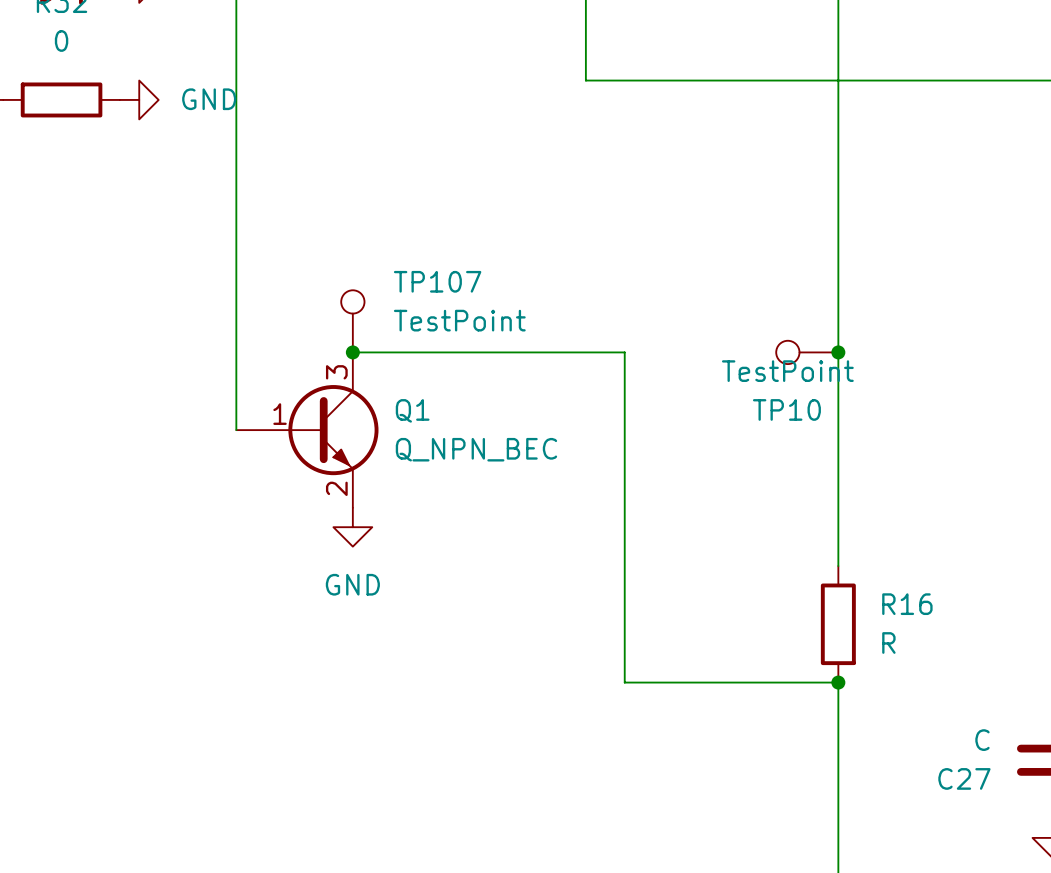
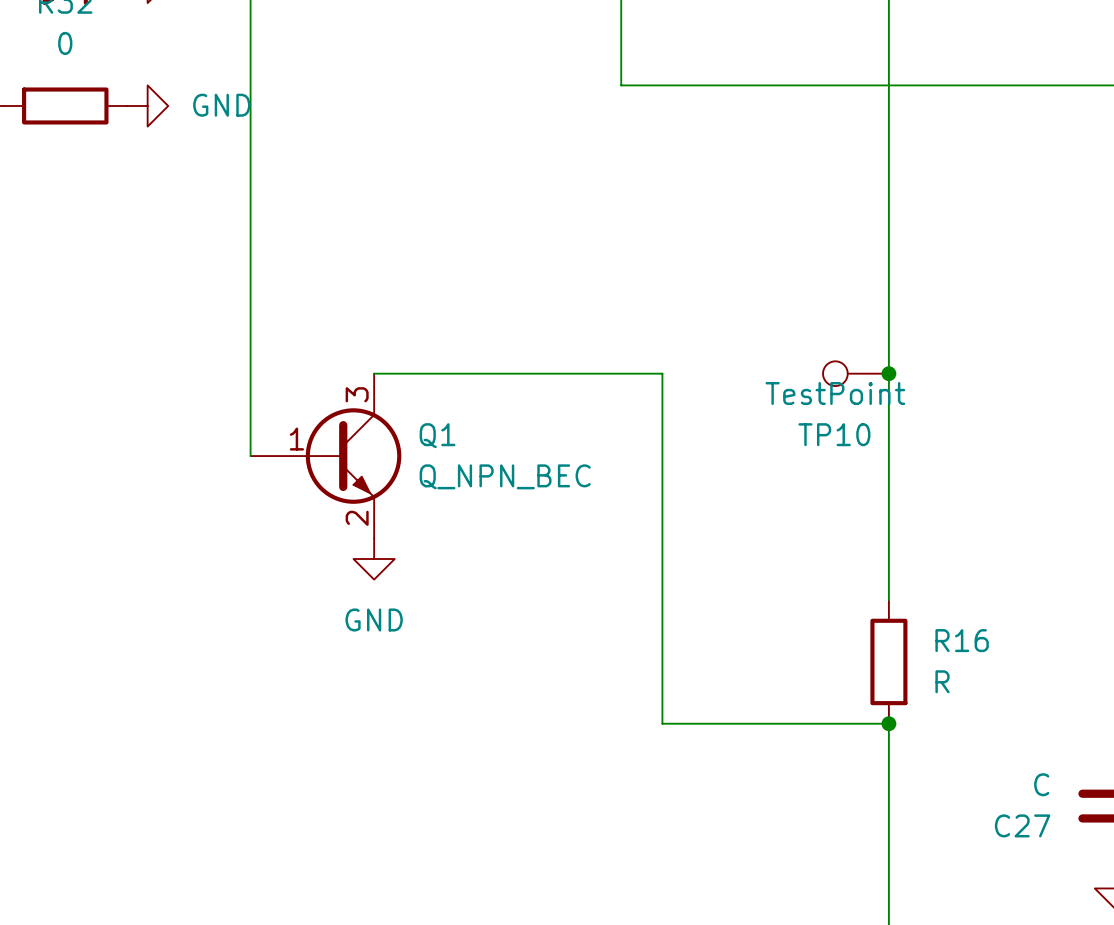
TP107: TestPoint (352, 321) -> none
junction: (352, 352) -> none

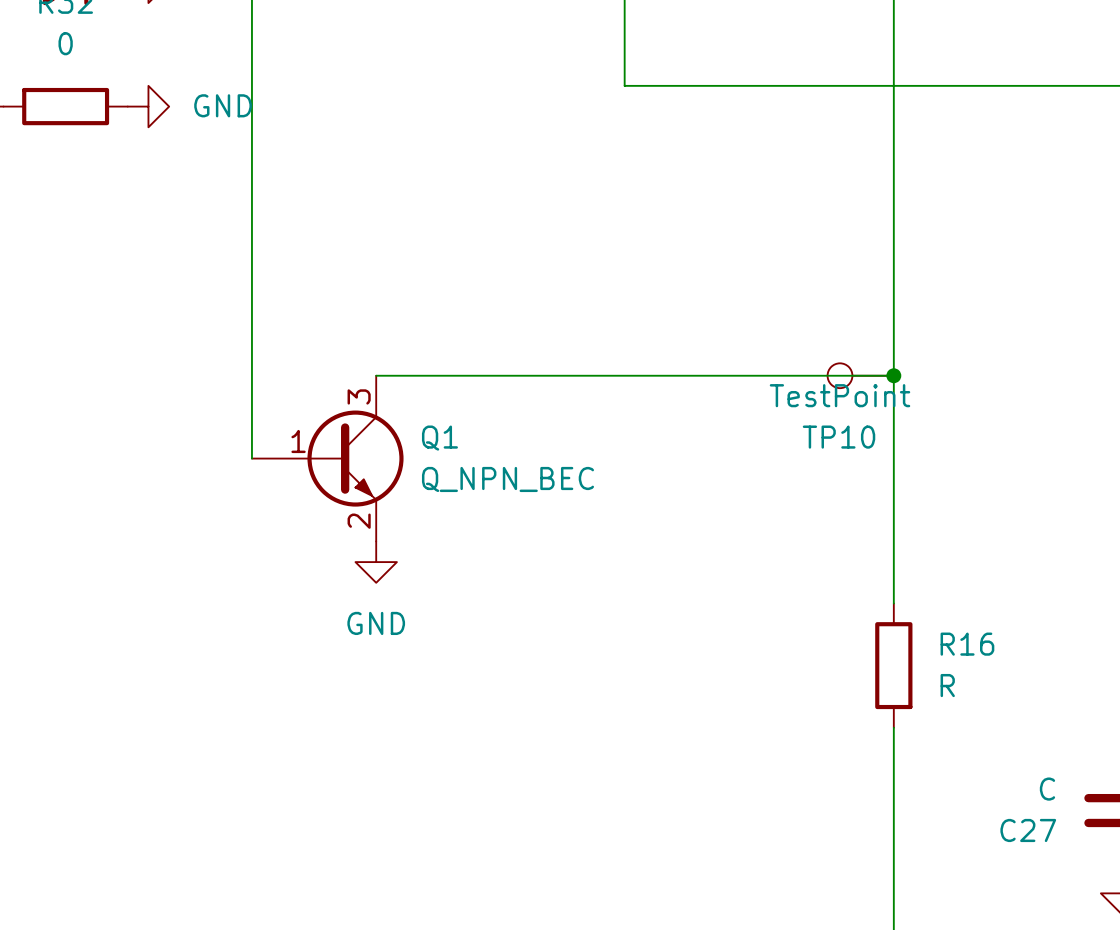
wire: (662, 373) (662, 723) (888, 723) -> (666, 375) (893, 375)
junction: (888, 723) -> none

